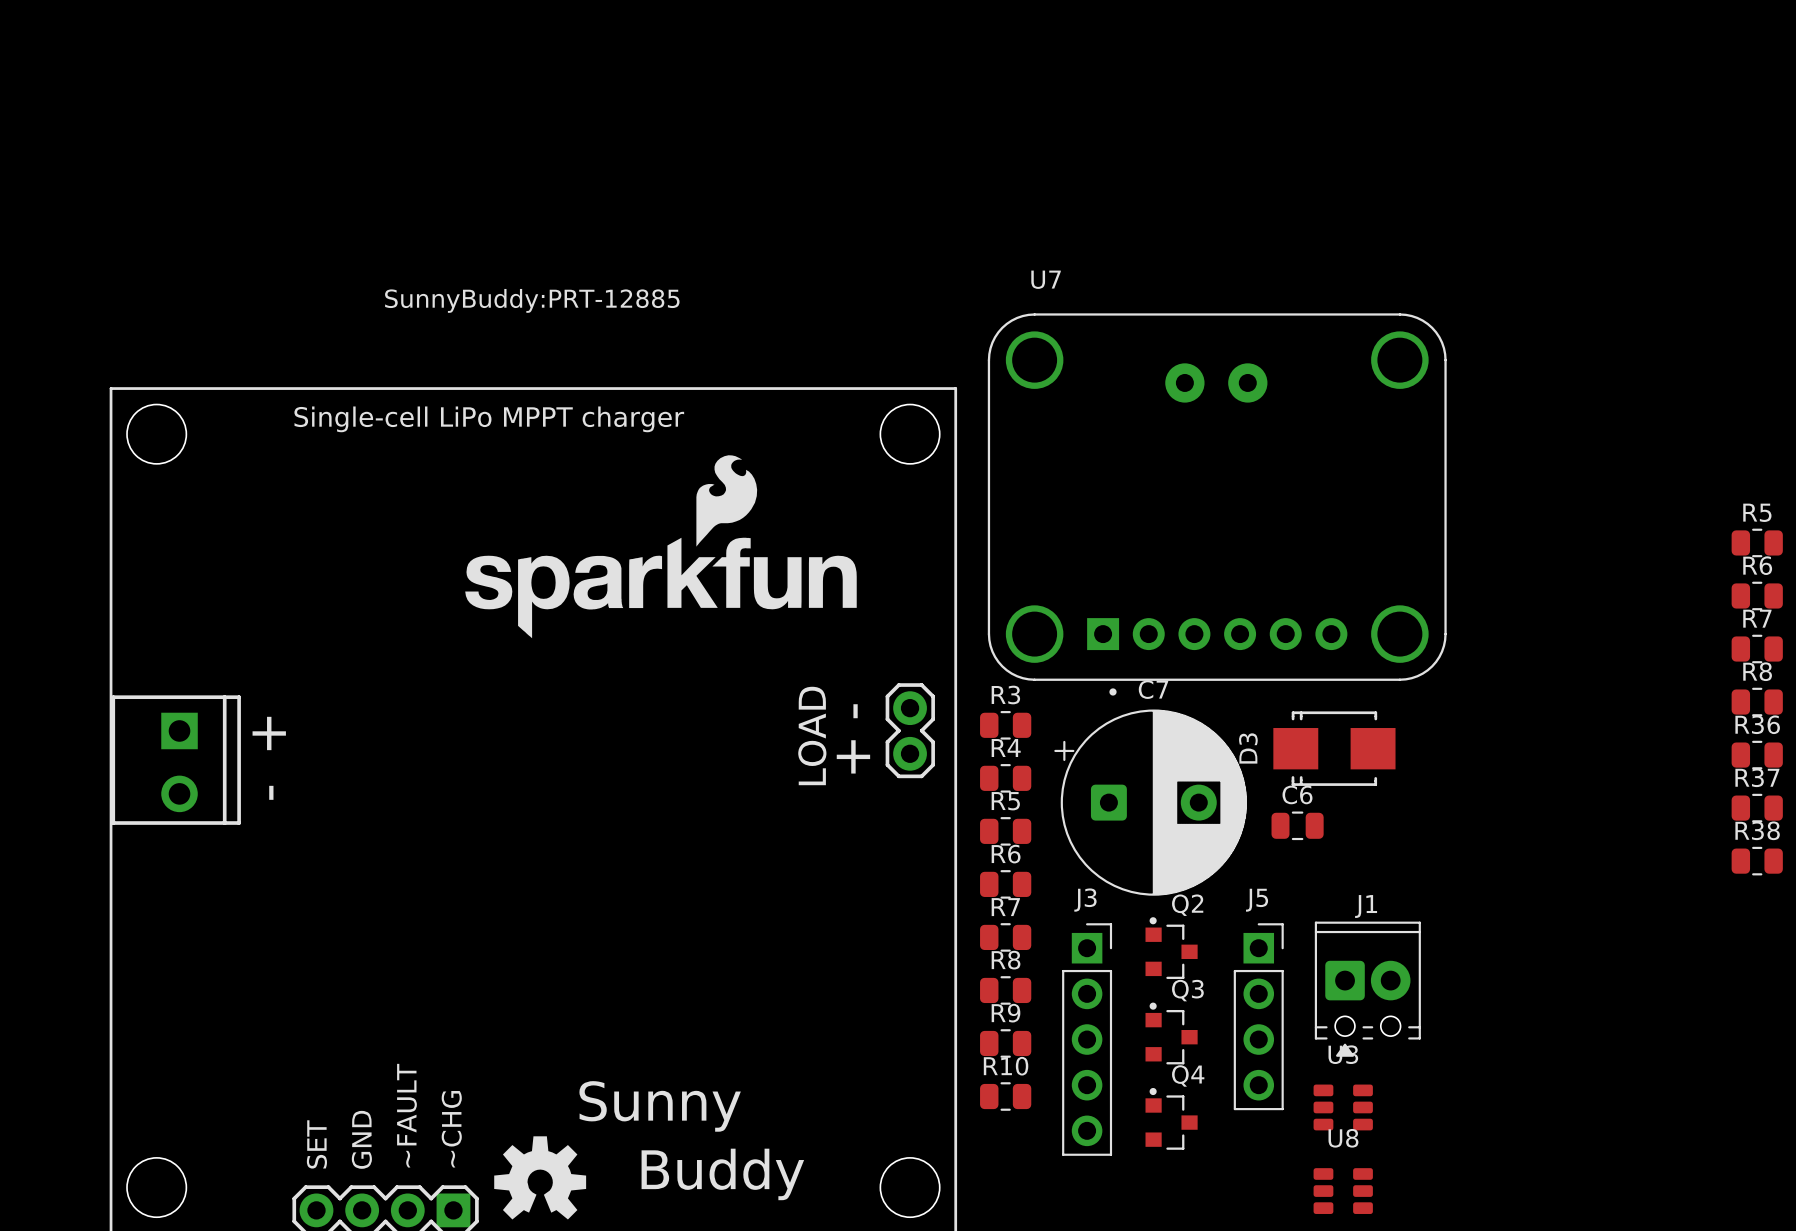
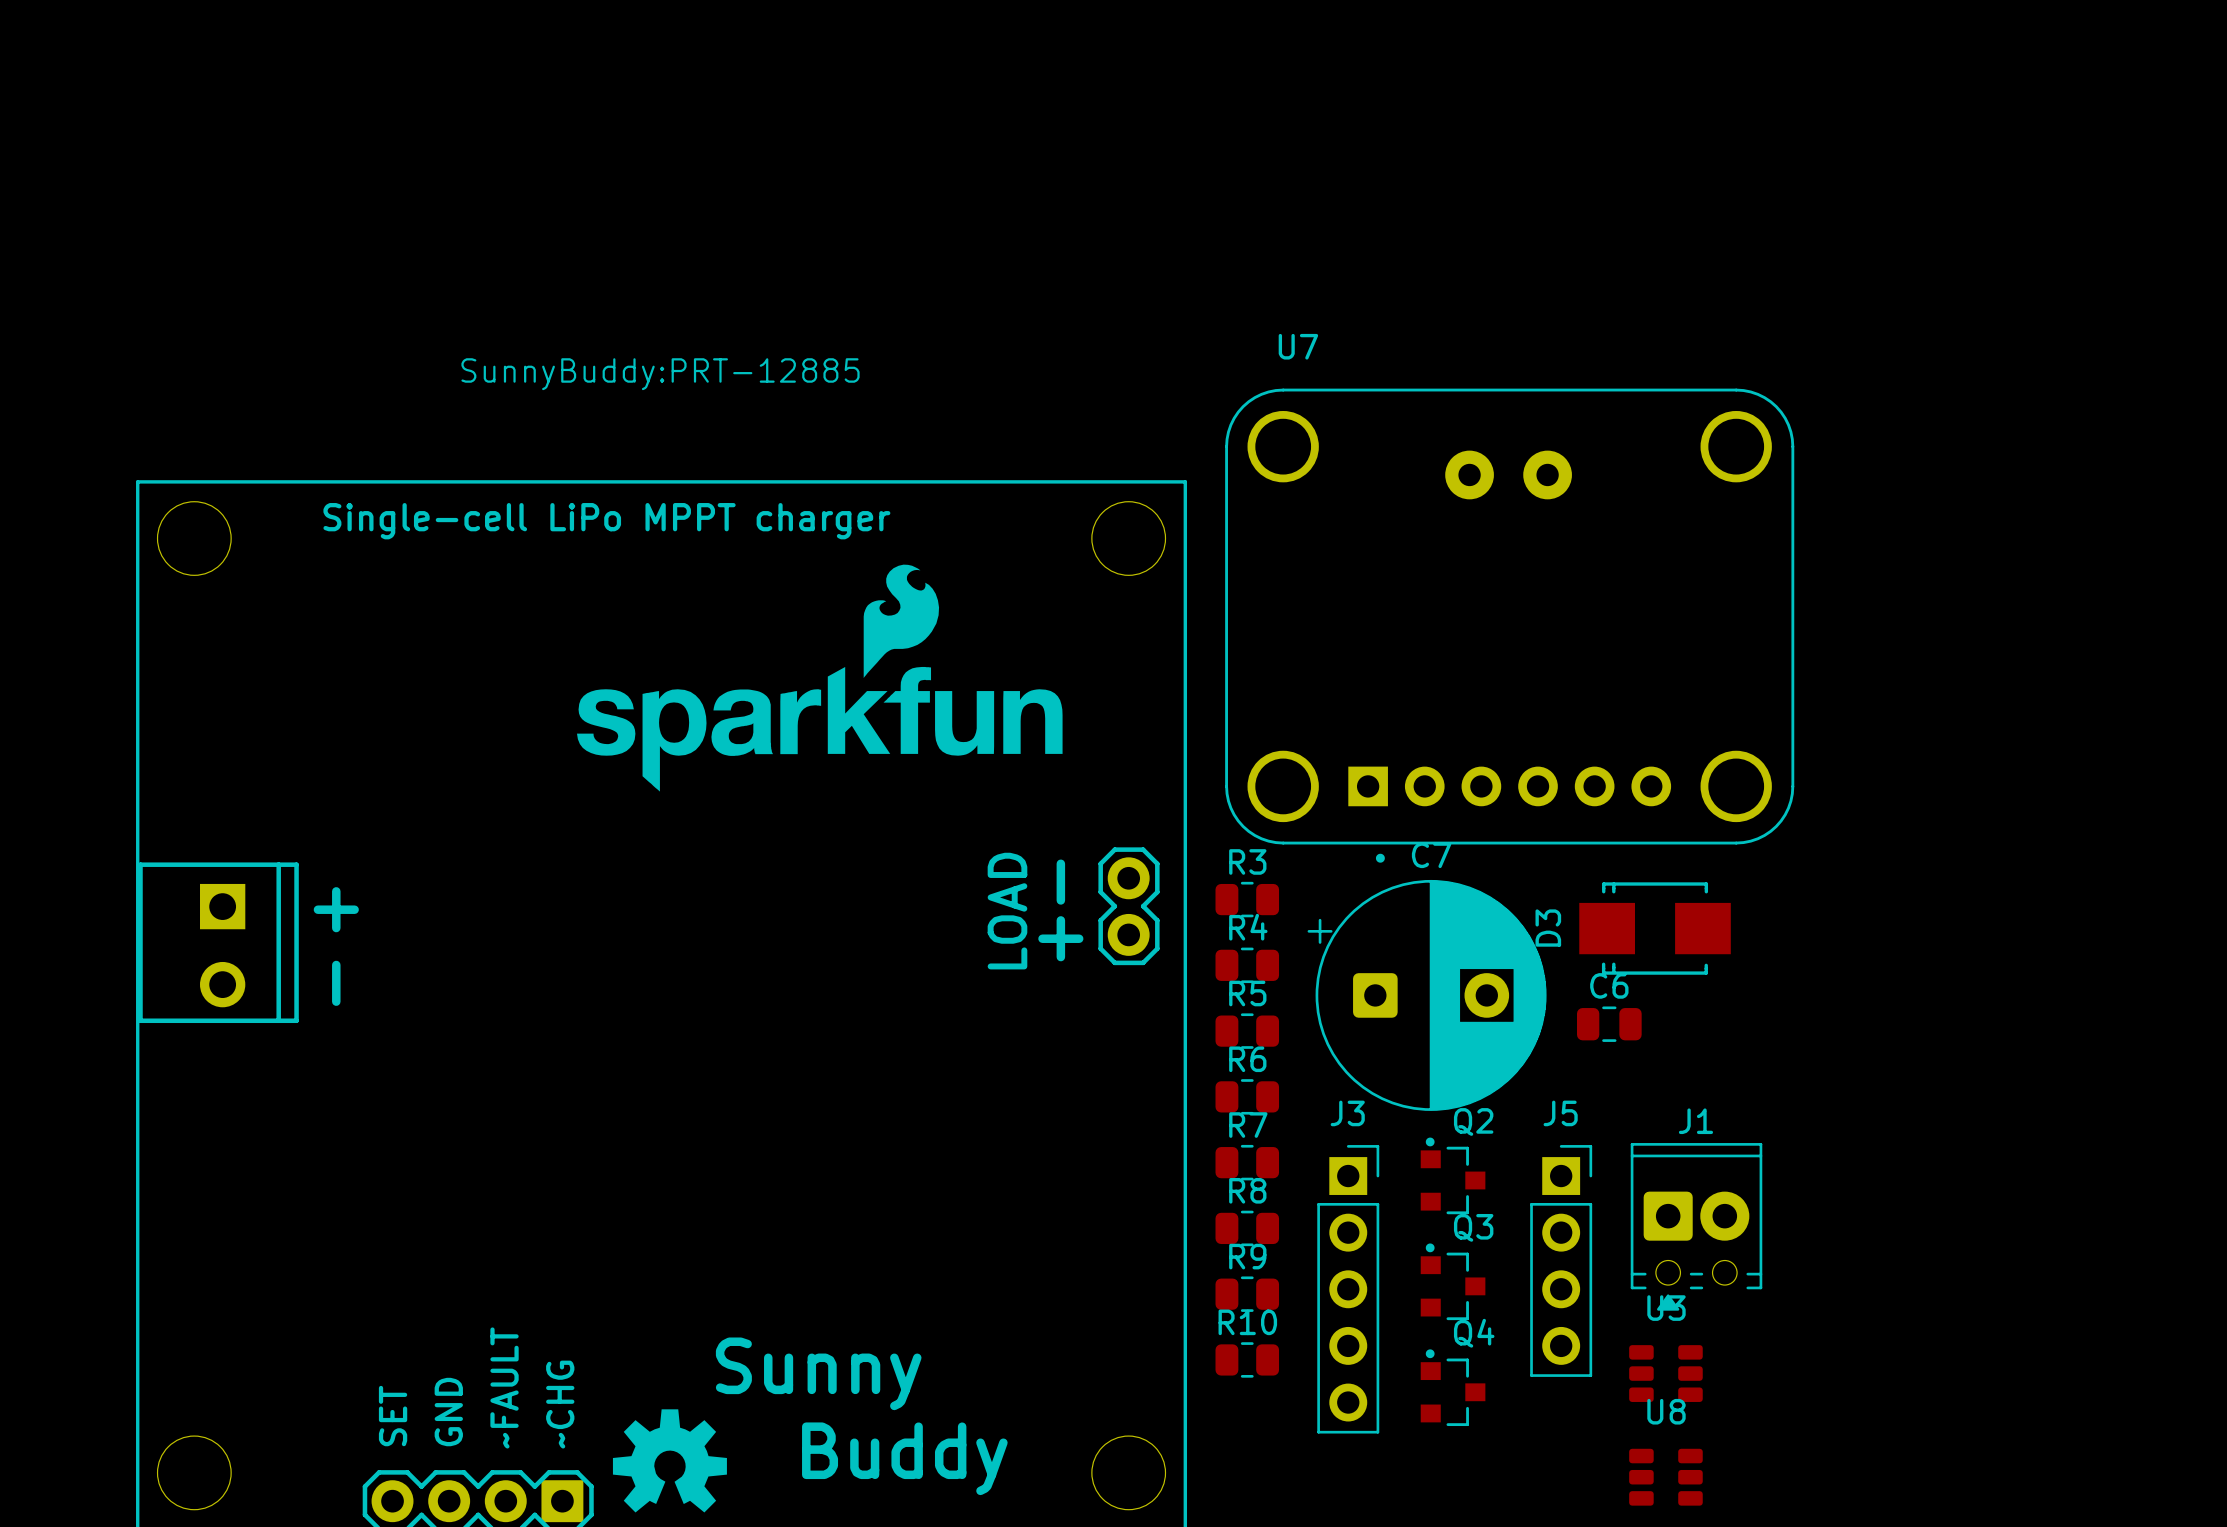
R5: (1757, 542) -> none
R6: (1757, 595) -> none
R7: (1757, 649) -> none
R8: (1757, 702) -> none
R36: (1757, 755) -> none
R37: (1757, 808) -> none
R38: (1757, 861) -> none

